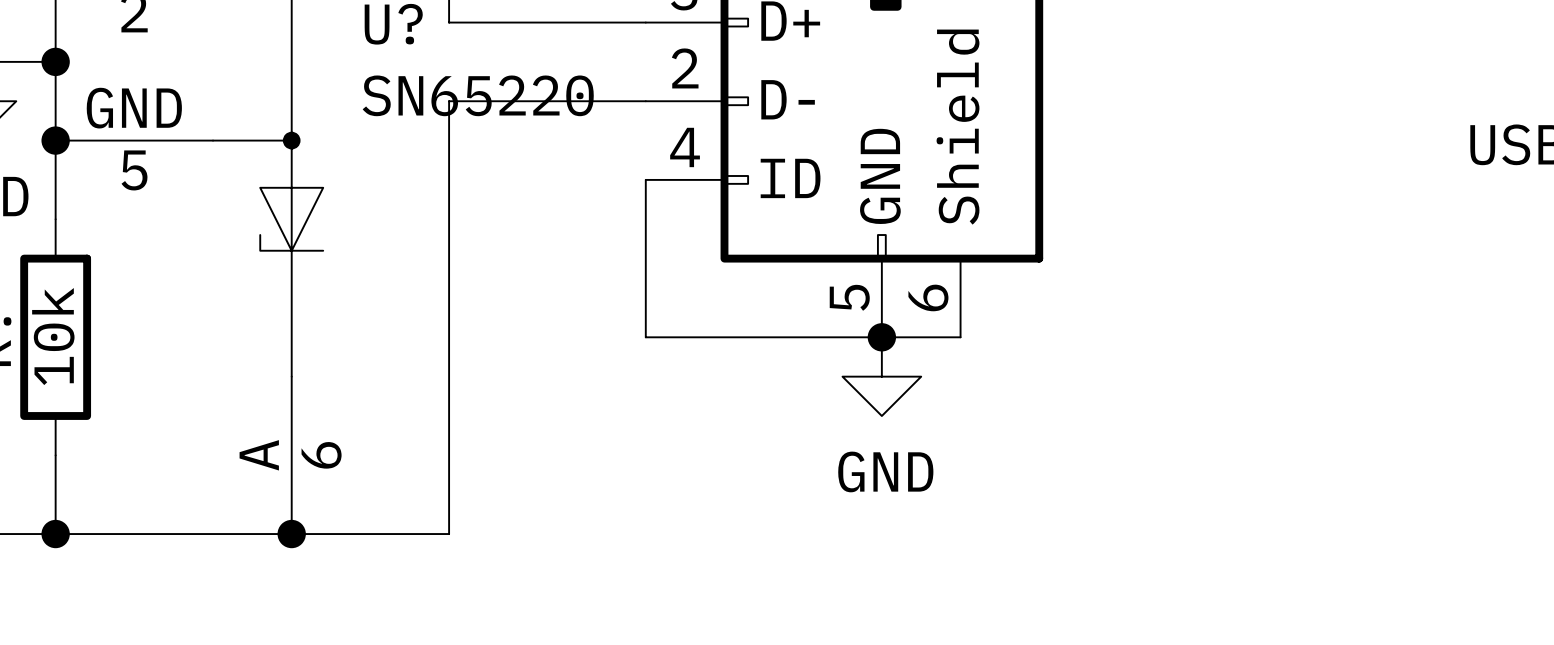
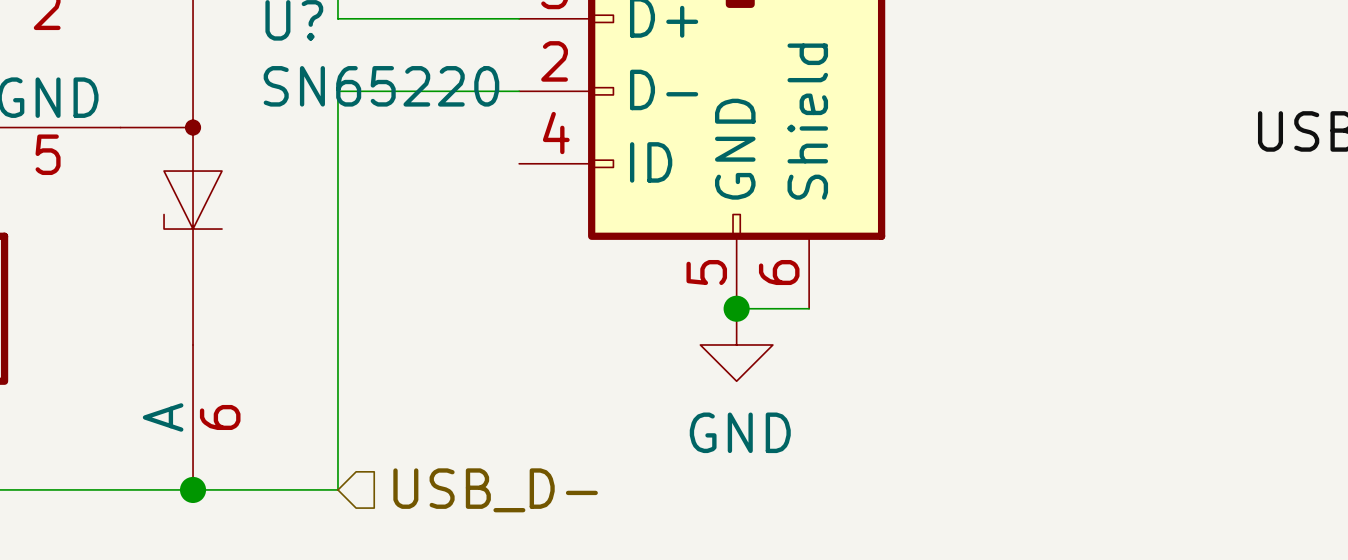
wire: (645, 179) (645, 337) (881, 337) -> none
hierarchical label: none -> USB_D- (495, 490)

